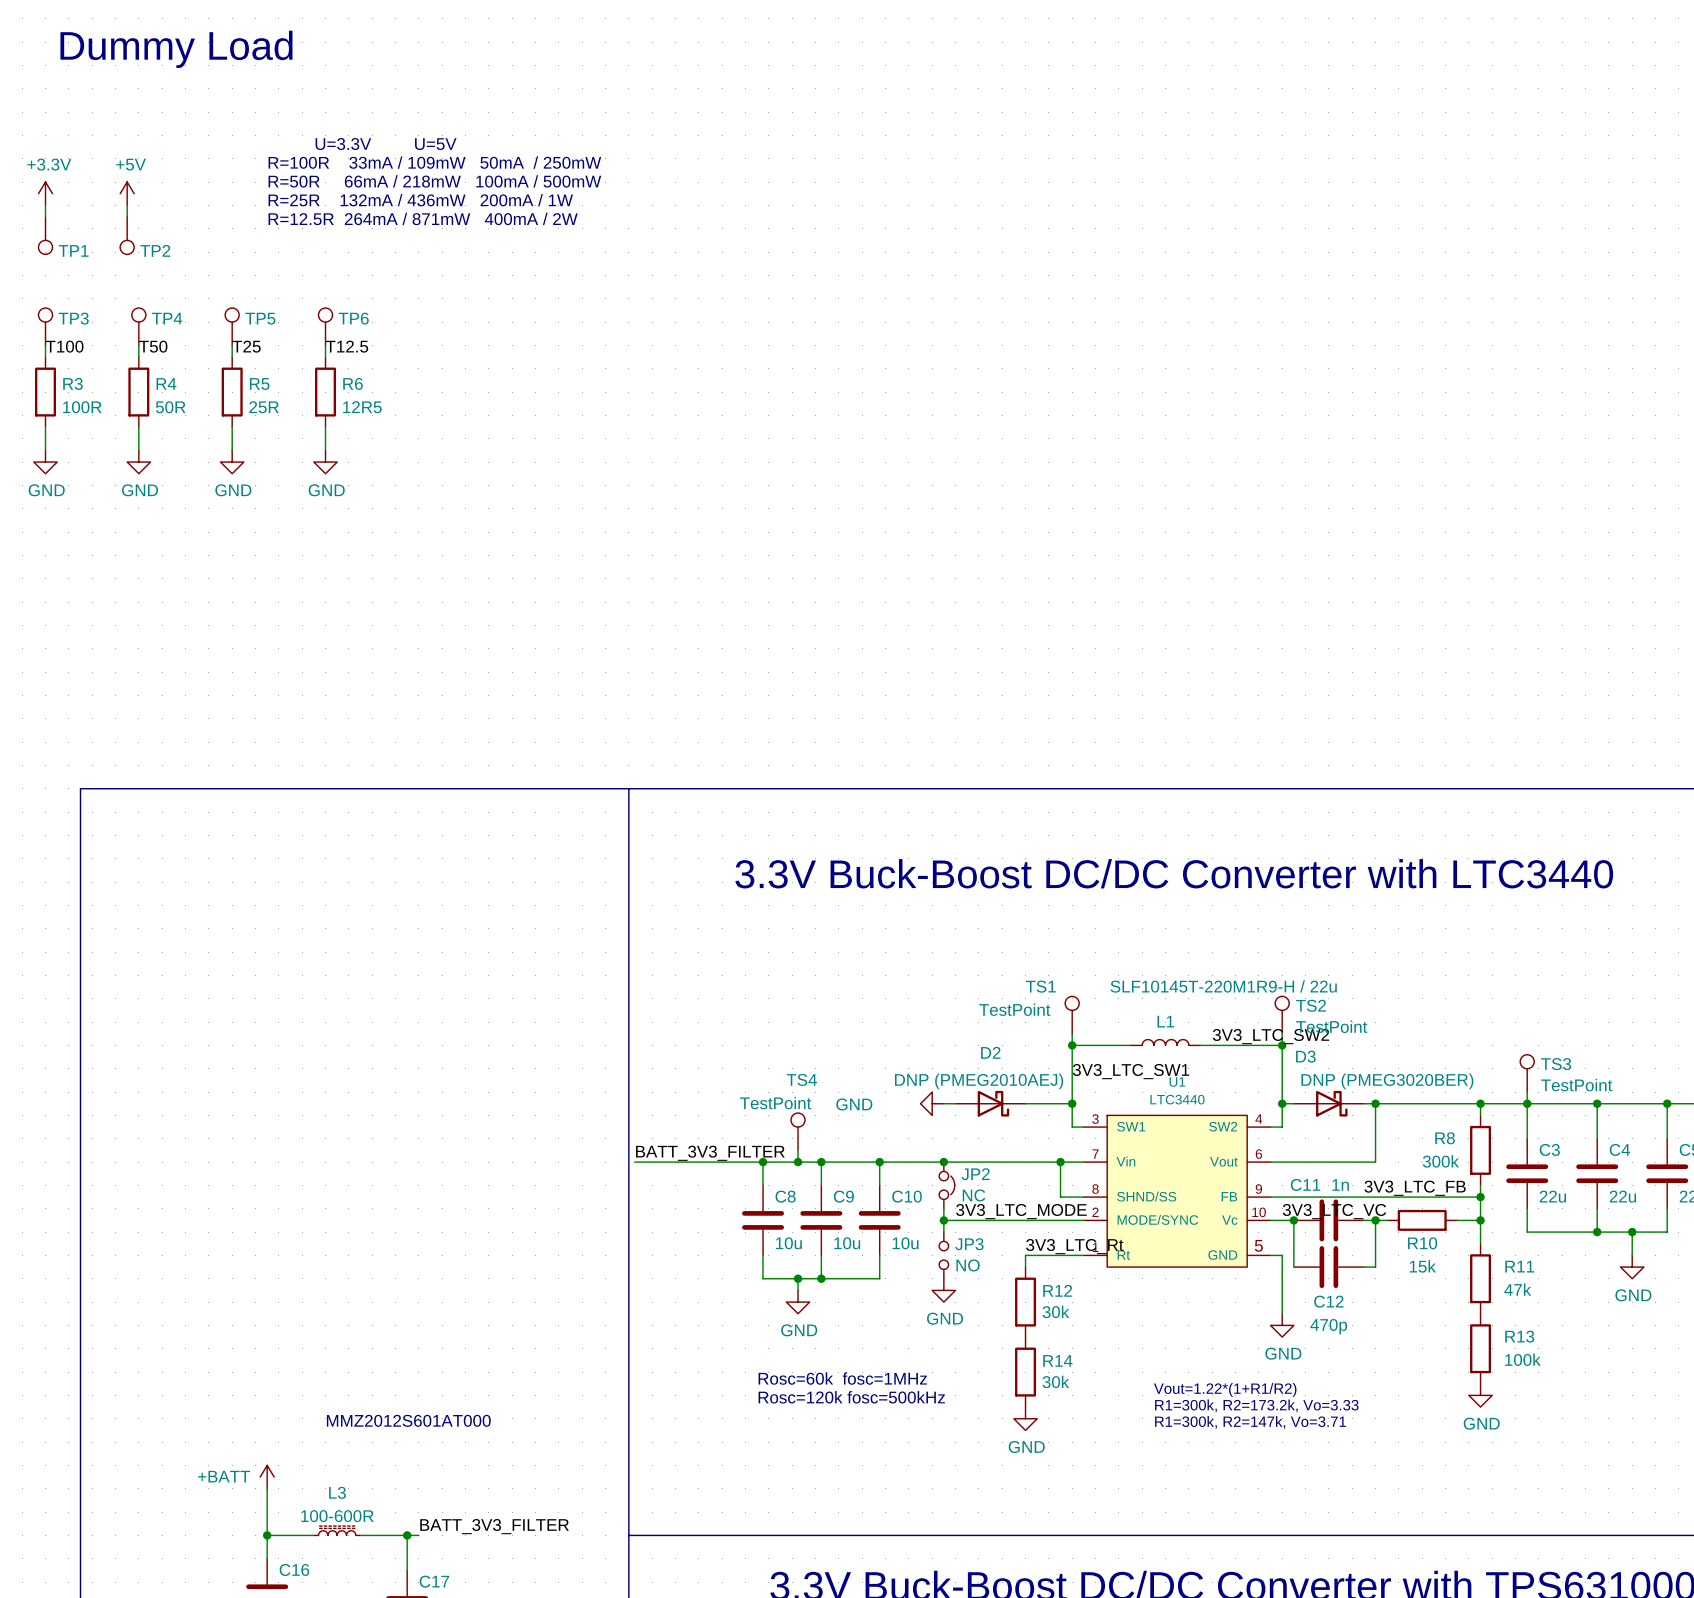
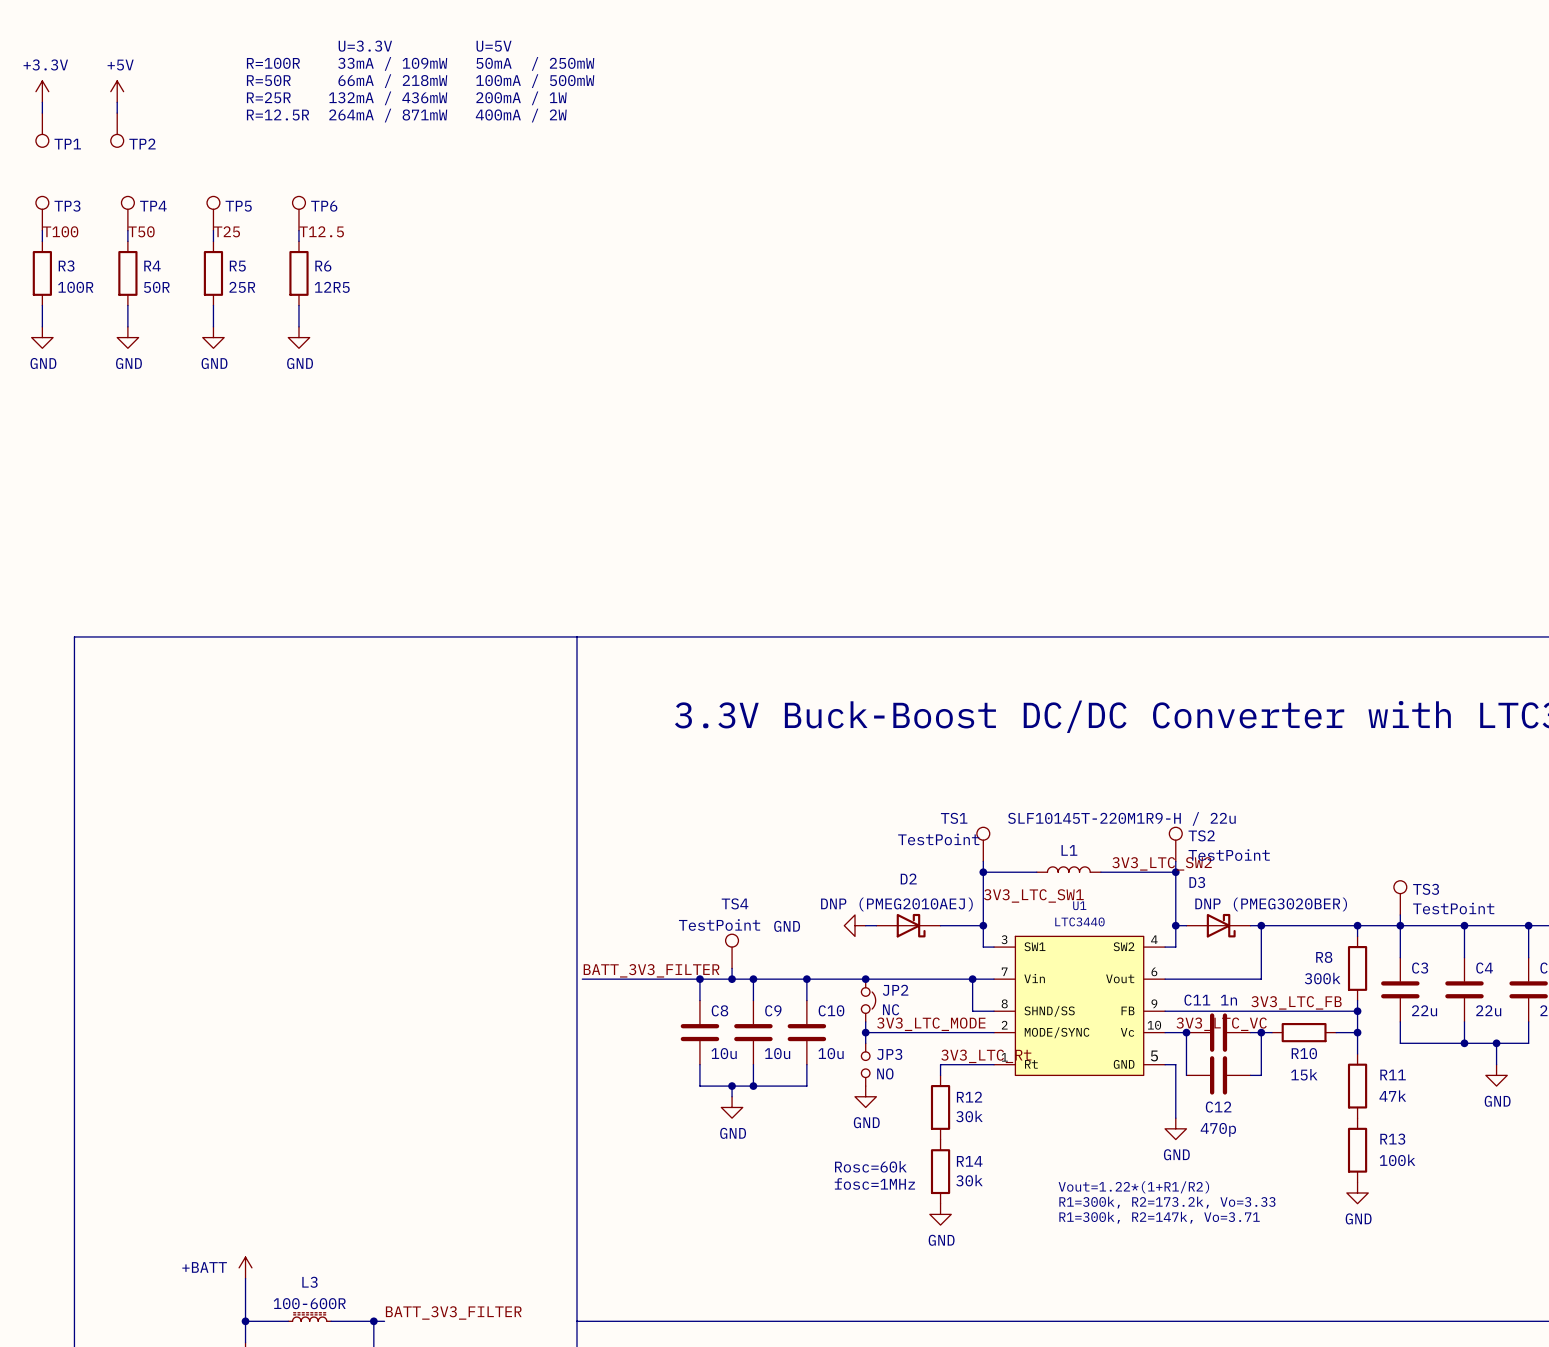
text: none -> Rosc=60k (870, 1166)
text: Rosc=60k fosc=1MHz (842, 1378) -> fosc=1MHz (874, 1184)
text: Rosc=120k fosc=500kHz (851, 1397) -> none
text: MMZ2012S601AT000 (408, 1420) -> none

